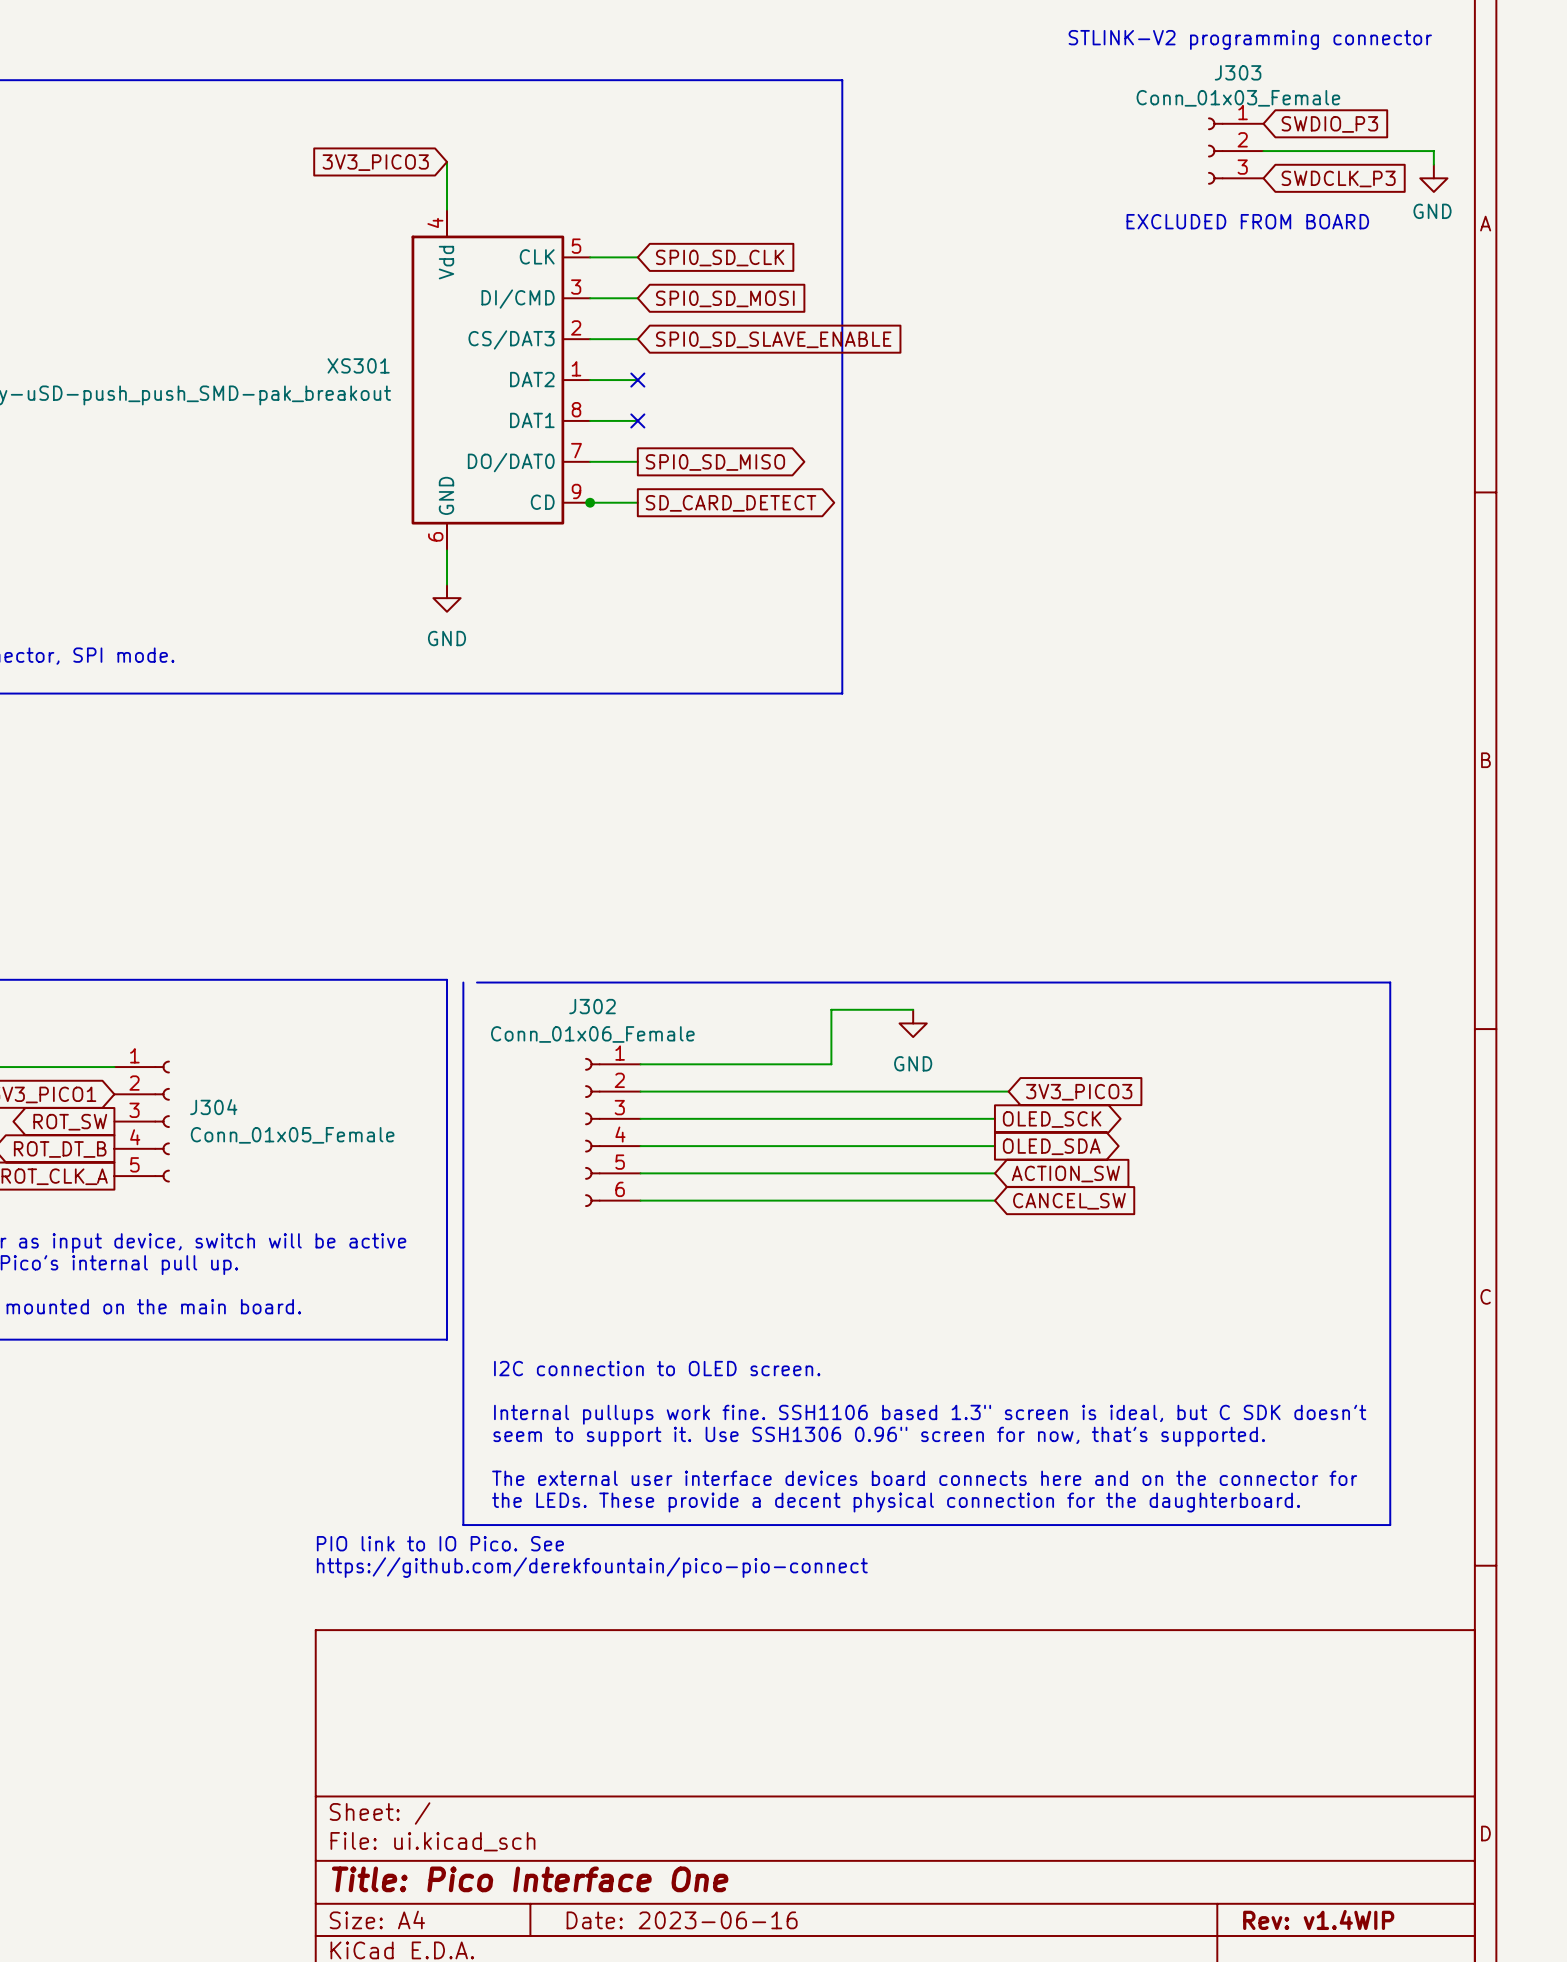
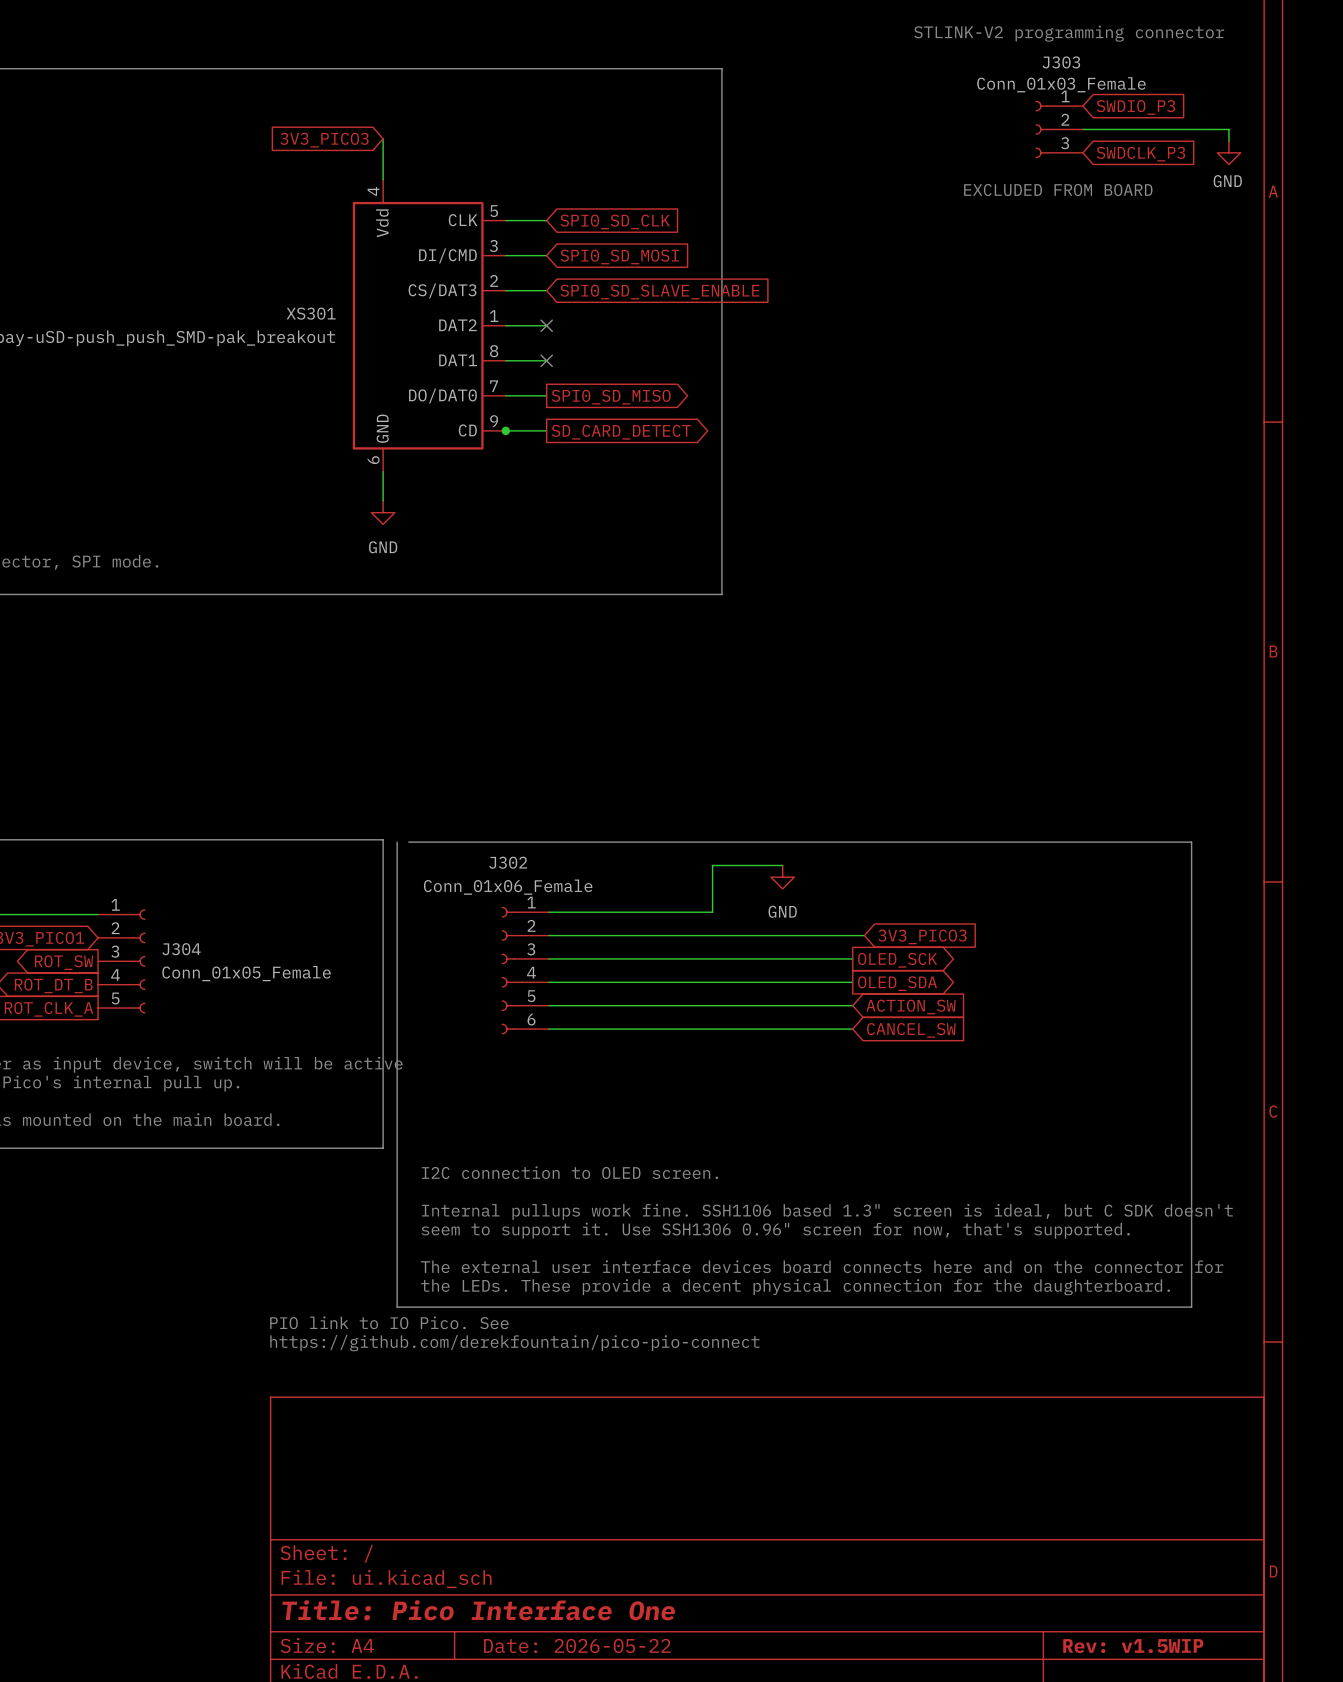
title block: Rev: v1.4WIP (1318, 1919) -> Rev: v1.5WIP (1133, 1646)
title block: Date: 2023-06-16 (682, 1920) -> Date: 2026-05-22 (577, 1645)

